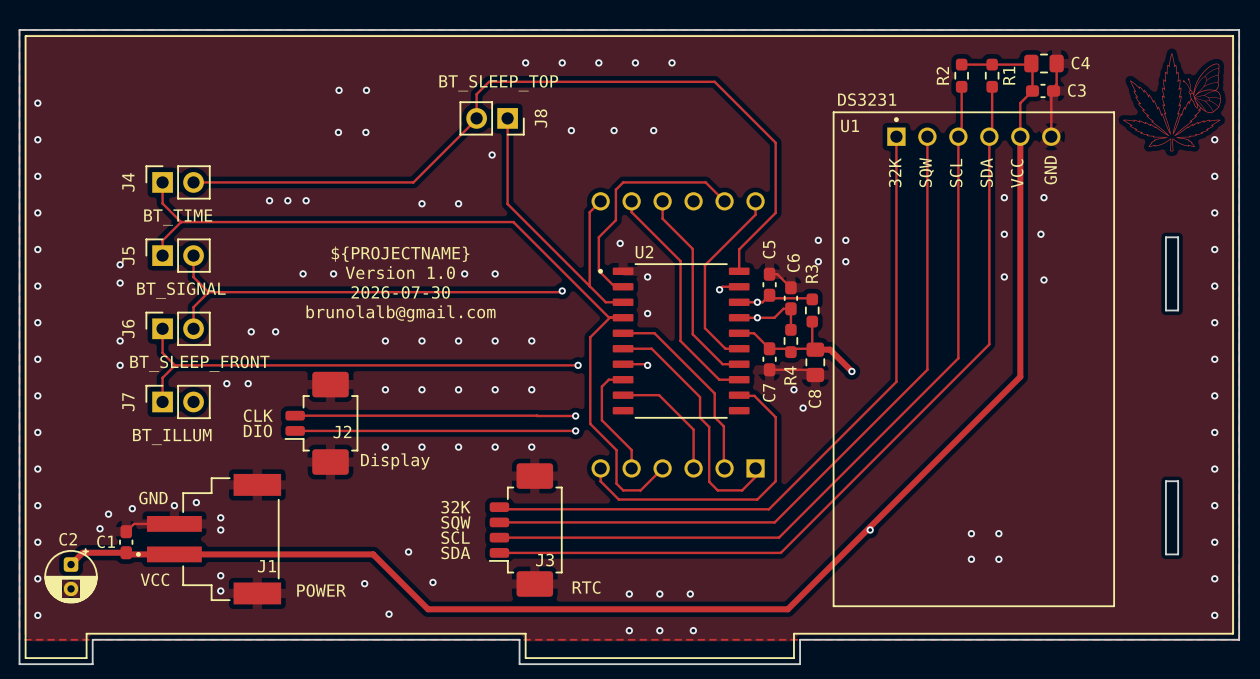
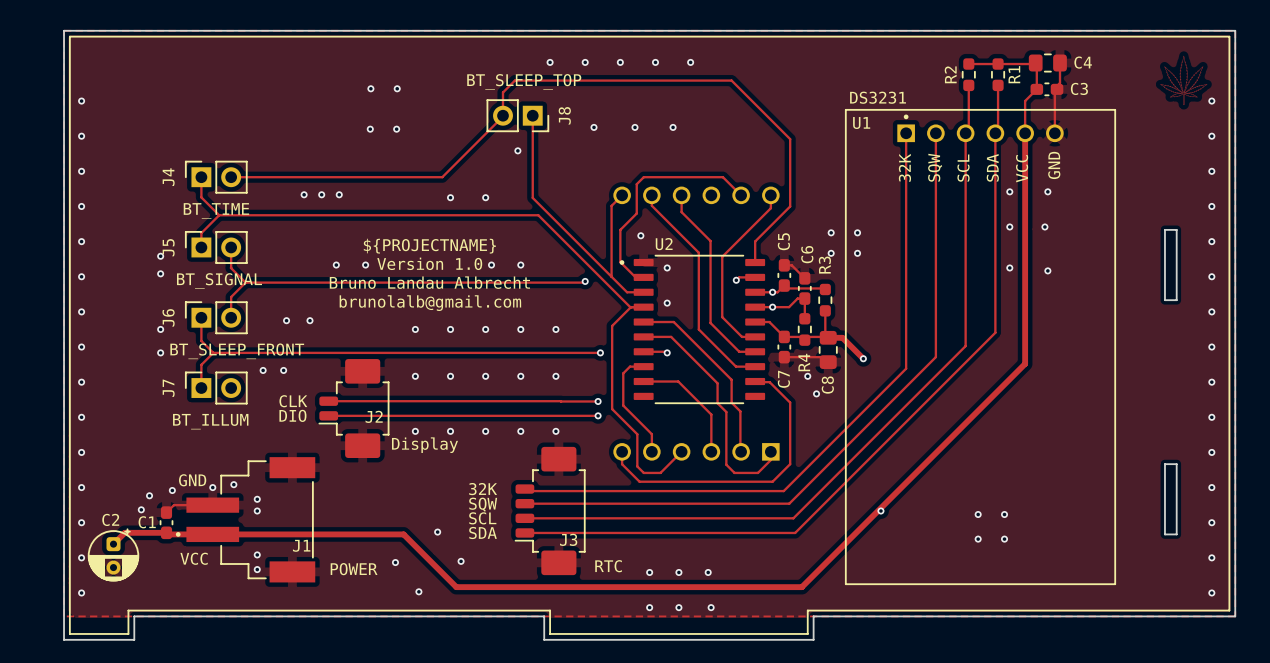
drawing: [1123, 53, 1222, 152] -> none
drawing: none -> [1160, 55, 1208, 106]
via: none -> (1211, 101)
text: 2026-07-30 (400, 292) -> Bruno Landau Albrecht (429, 282)

